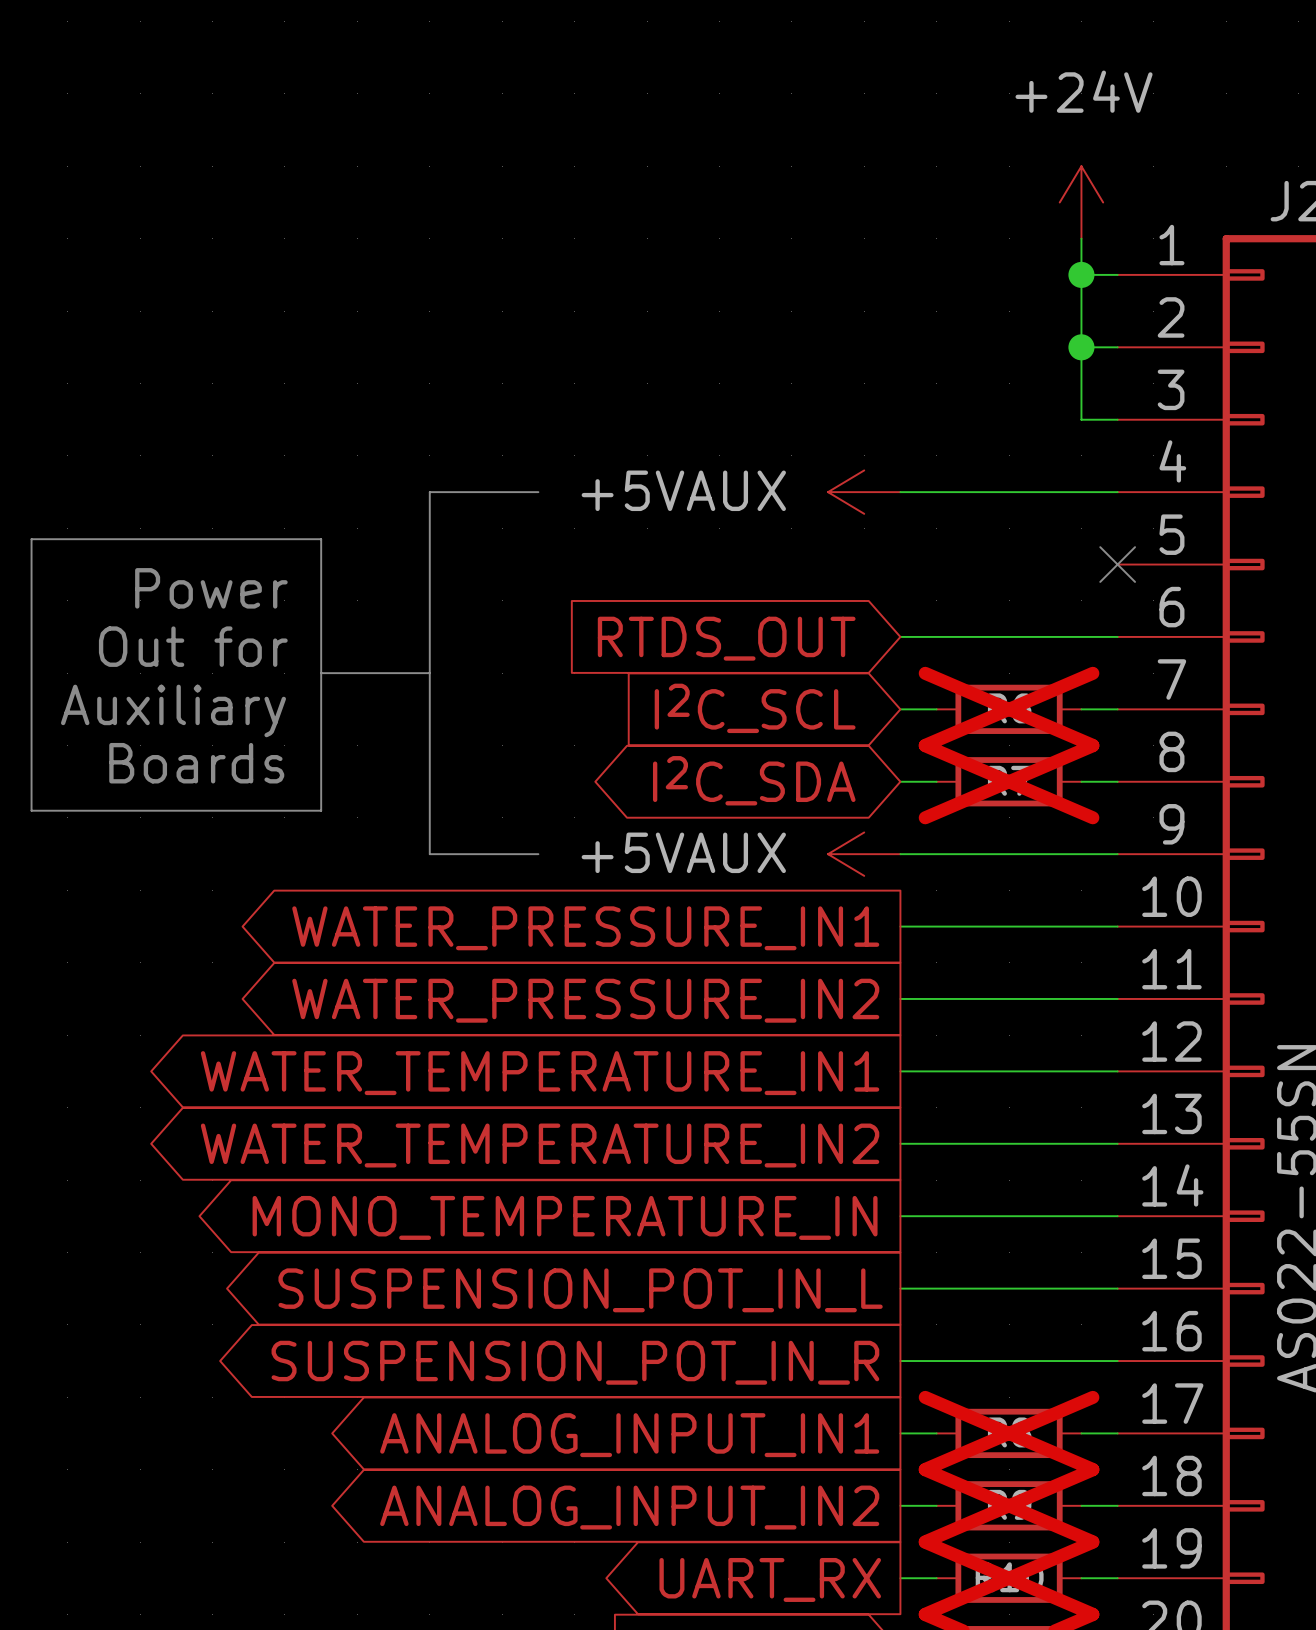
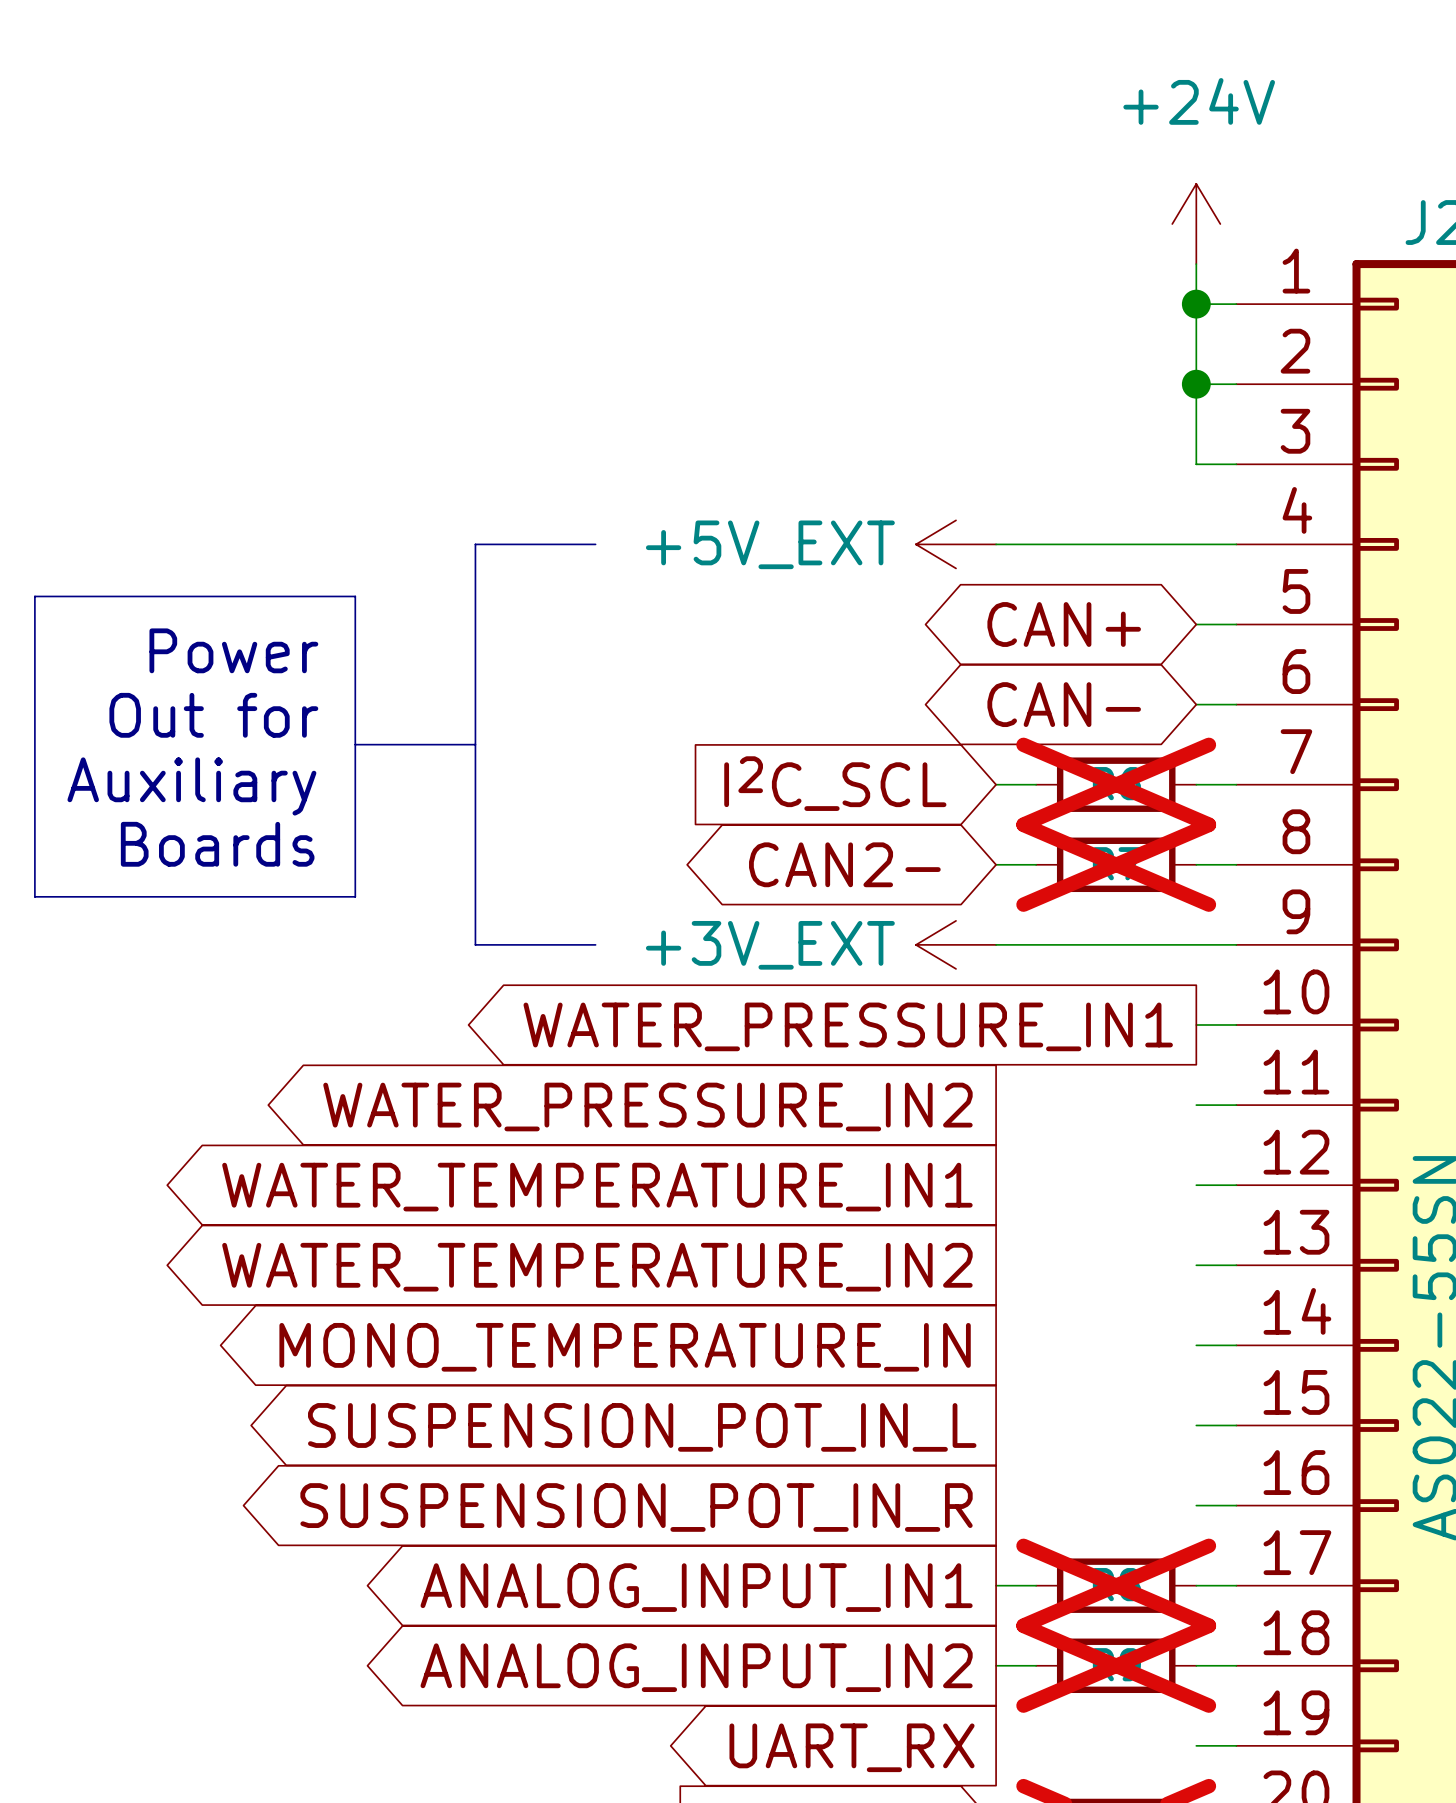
power symbol: +5VAUX (864, 492) -> +5V_EXT (956, 544)
global label: none -> CAN+ (1064, 624)
wire: none -> (1196, 624) (1236, 624)
no-connect mark: (1117, 564) -> none
wire: (900, 636) (1081, 636) -> none
global label: none -> CAN- (1064, 704)
global label: RTDS_OUT (726, 638) -> none
global label: I2C_SDA (754, 780) -> CAN2- (844, 864)
power symbol: +5VAUX (864, 854) -> +3V_EXT (956, 944)
wire: (900, 926) (1081, 926) -> none
global label position: WATER_PRESSURE_IN1 (585, 928) -> WATER_PRESSURE_IN1 (848, 1026)
wire: (900, 998) (1081, 998) -> none
wire: (900, 1071) (1081, 1071) -> none
wire: (900, 1143) (1081, 1143) -> none
wire: (900, 1216) (1081, 1216) -> none
wire: (900, 1288) (1081, 1288) -> none
wire: (900, 1361) (1081, 1361) -> none
wire: (900, 1578) (936, 1578) -> none
part: (1009, 1578) -> none

